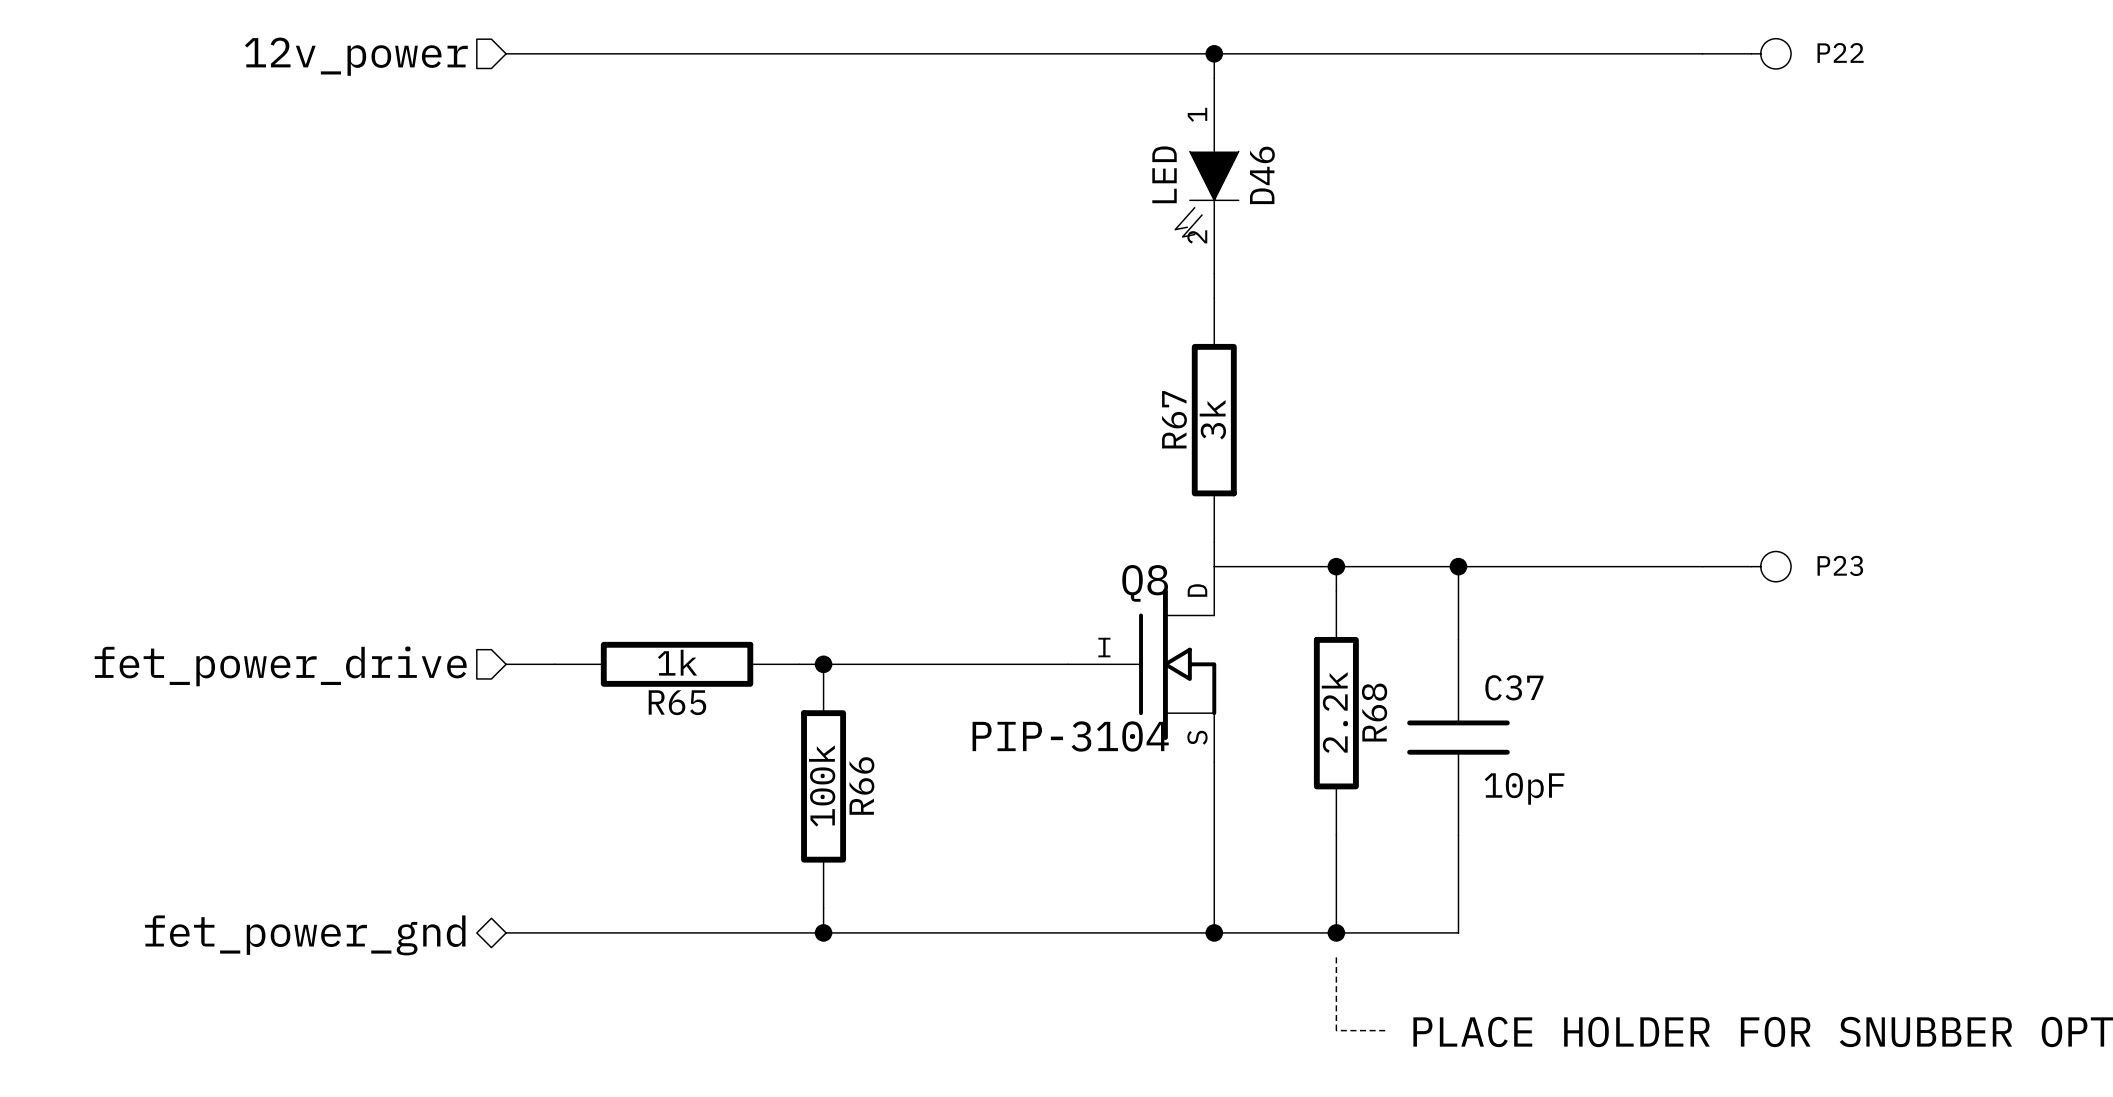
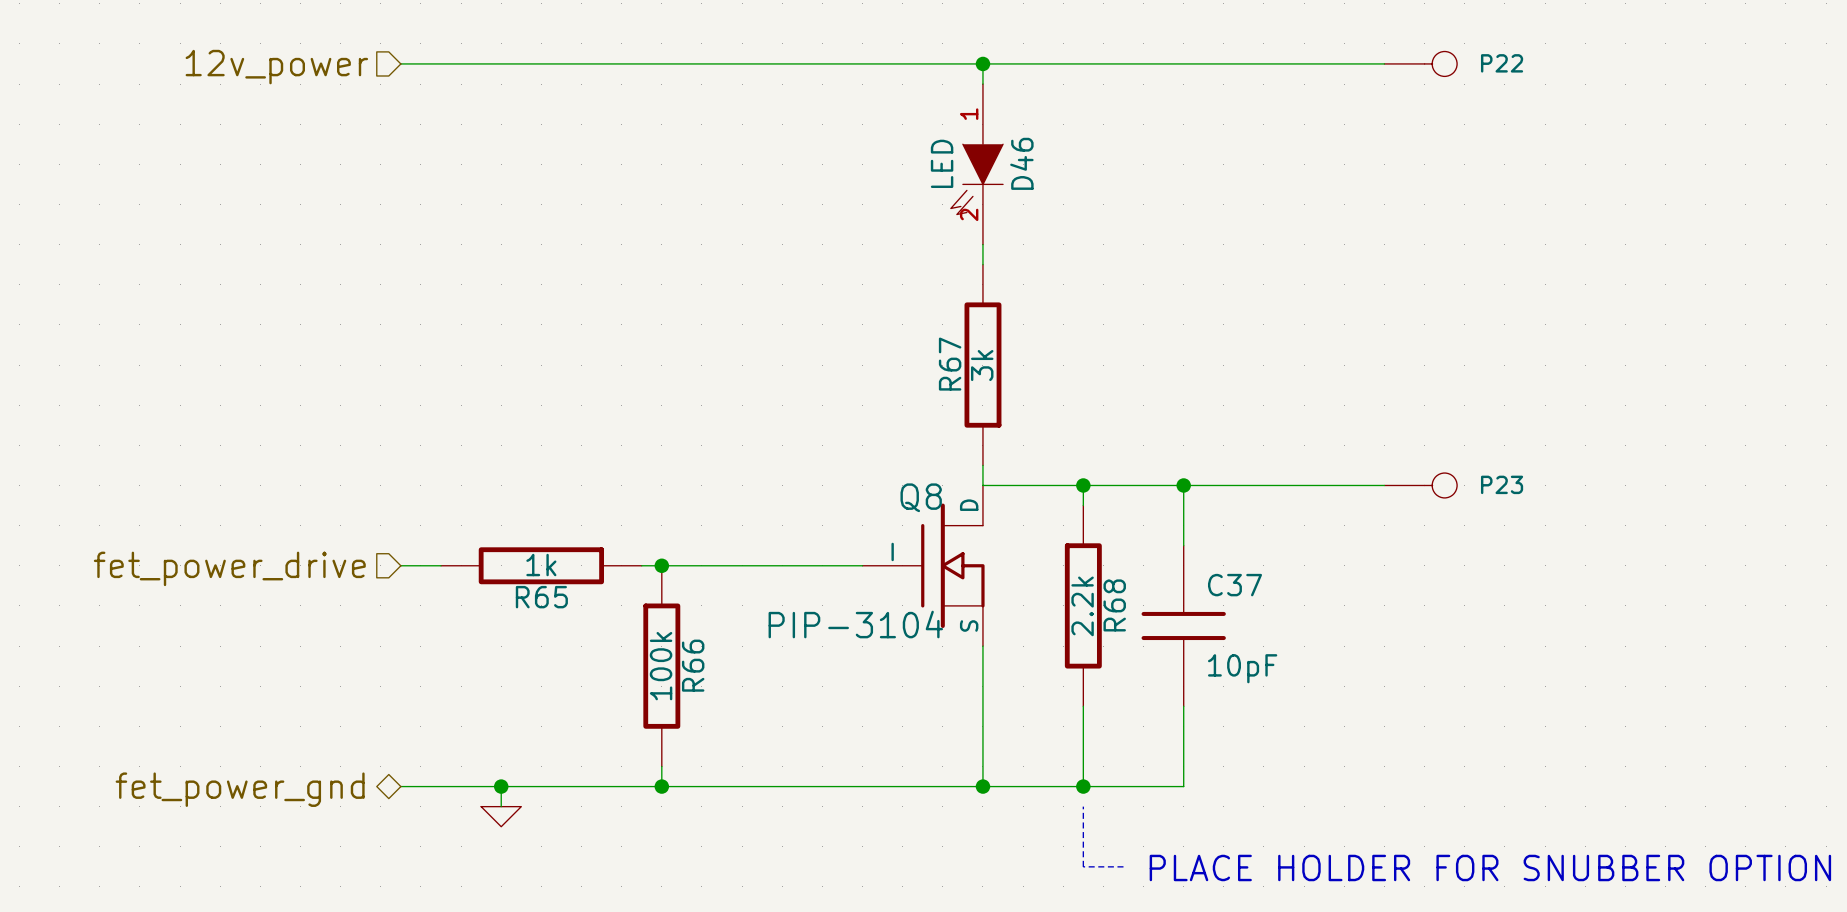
wire: none -> (501, 786) (501, 806)
junction: none -> (501, 786)
power symbol: none -> (501, 816)

